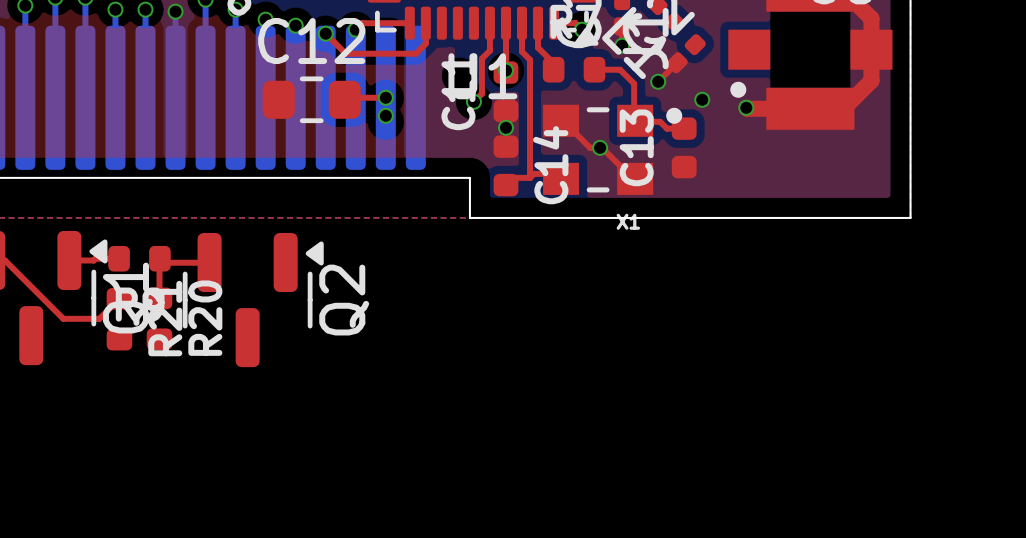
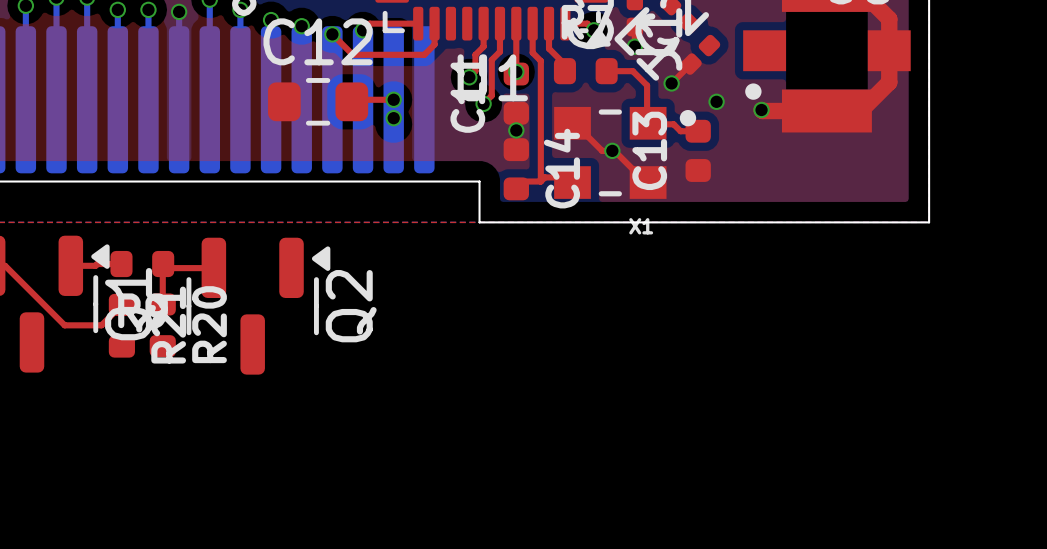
top track: none -> (483, 23) (483, 46) (475, 54) (475, 71) (469, 77)
via: none -> (469, 77)

